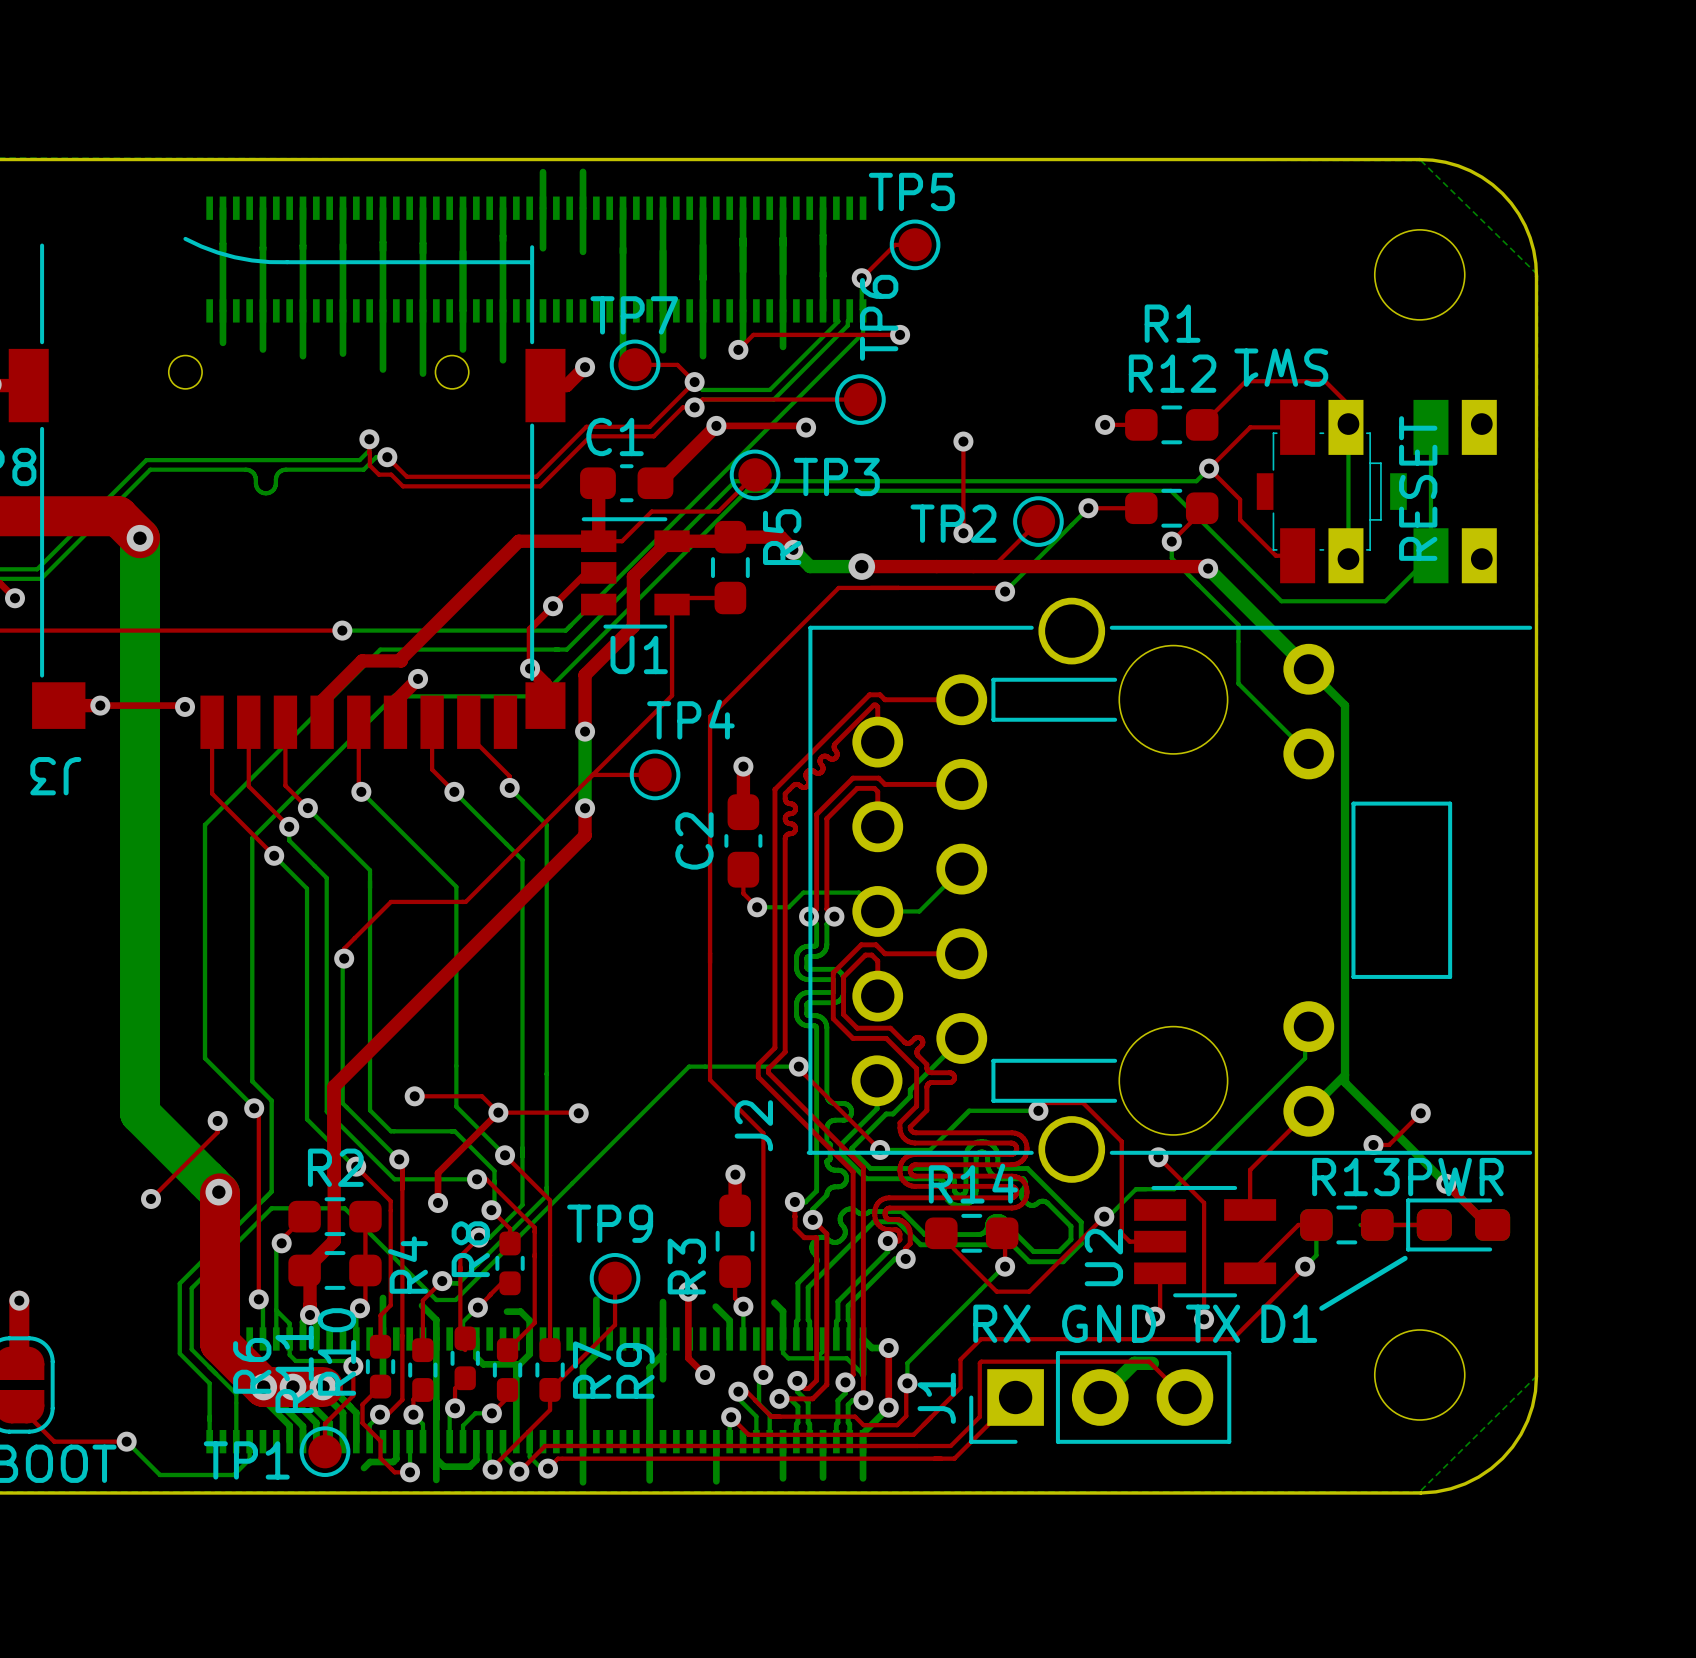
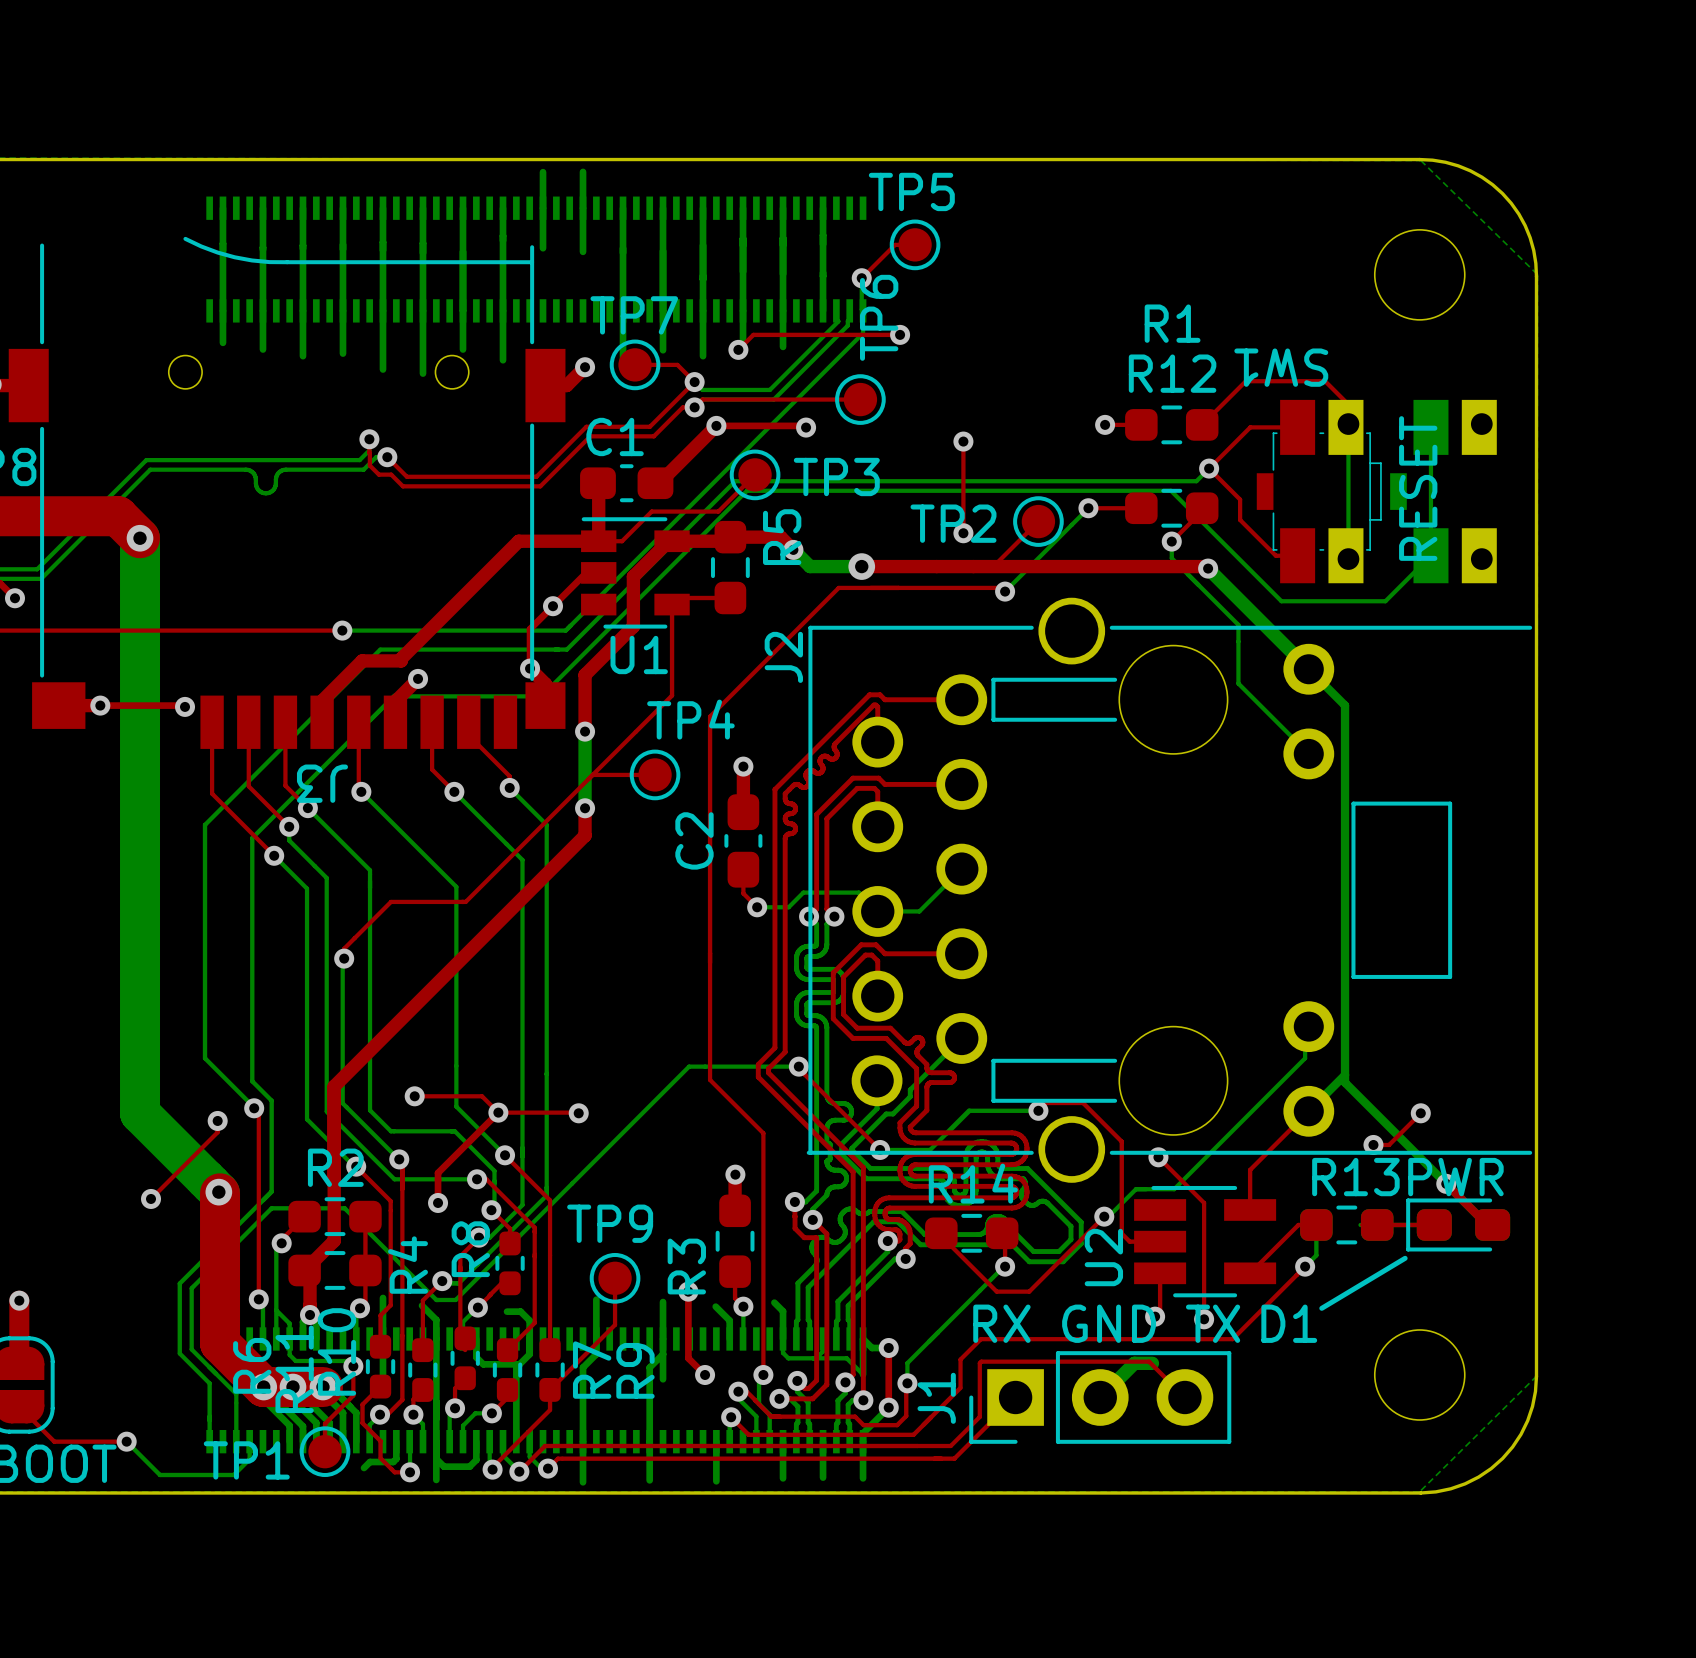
J3 name position: J3 (55, 776) -> J3 (322, 783)
J2 name position: J2 (753, 1125) -> J2 (783, 657)

